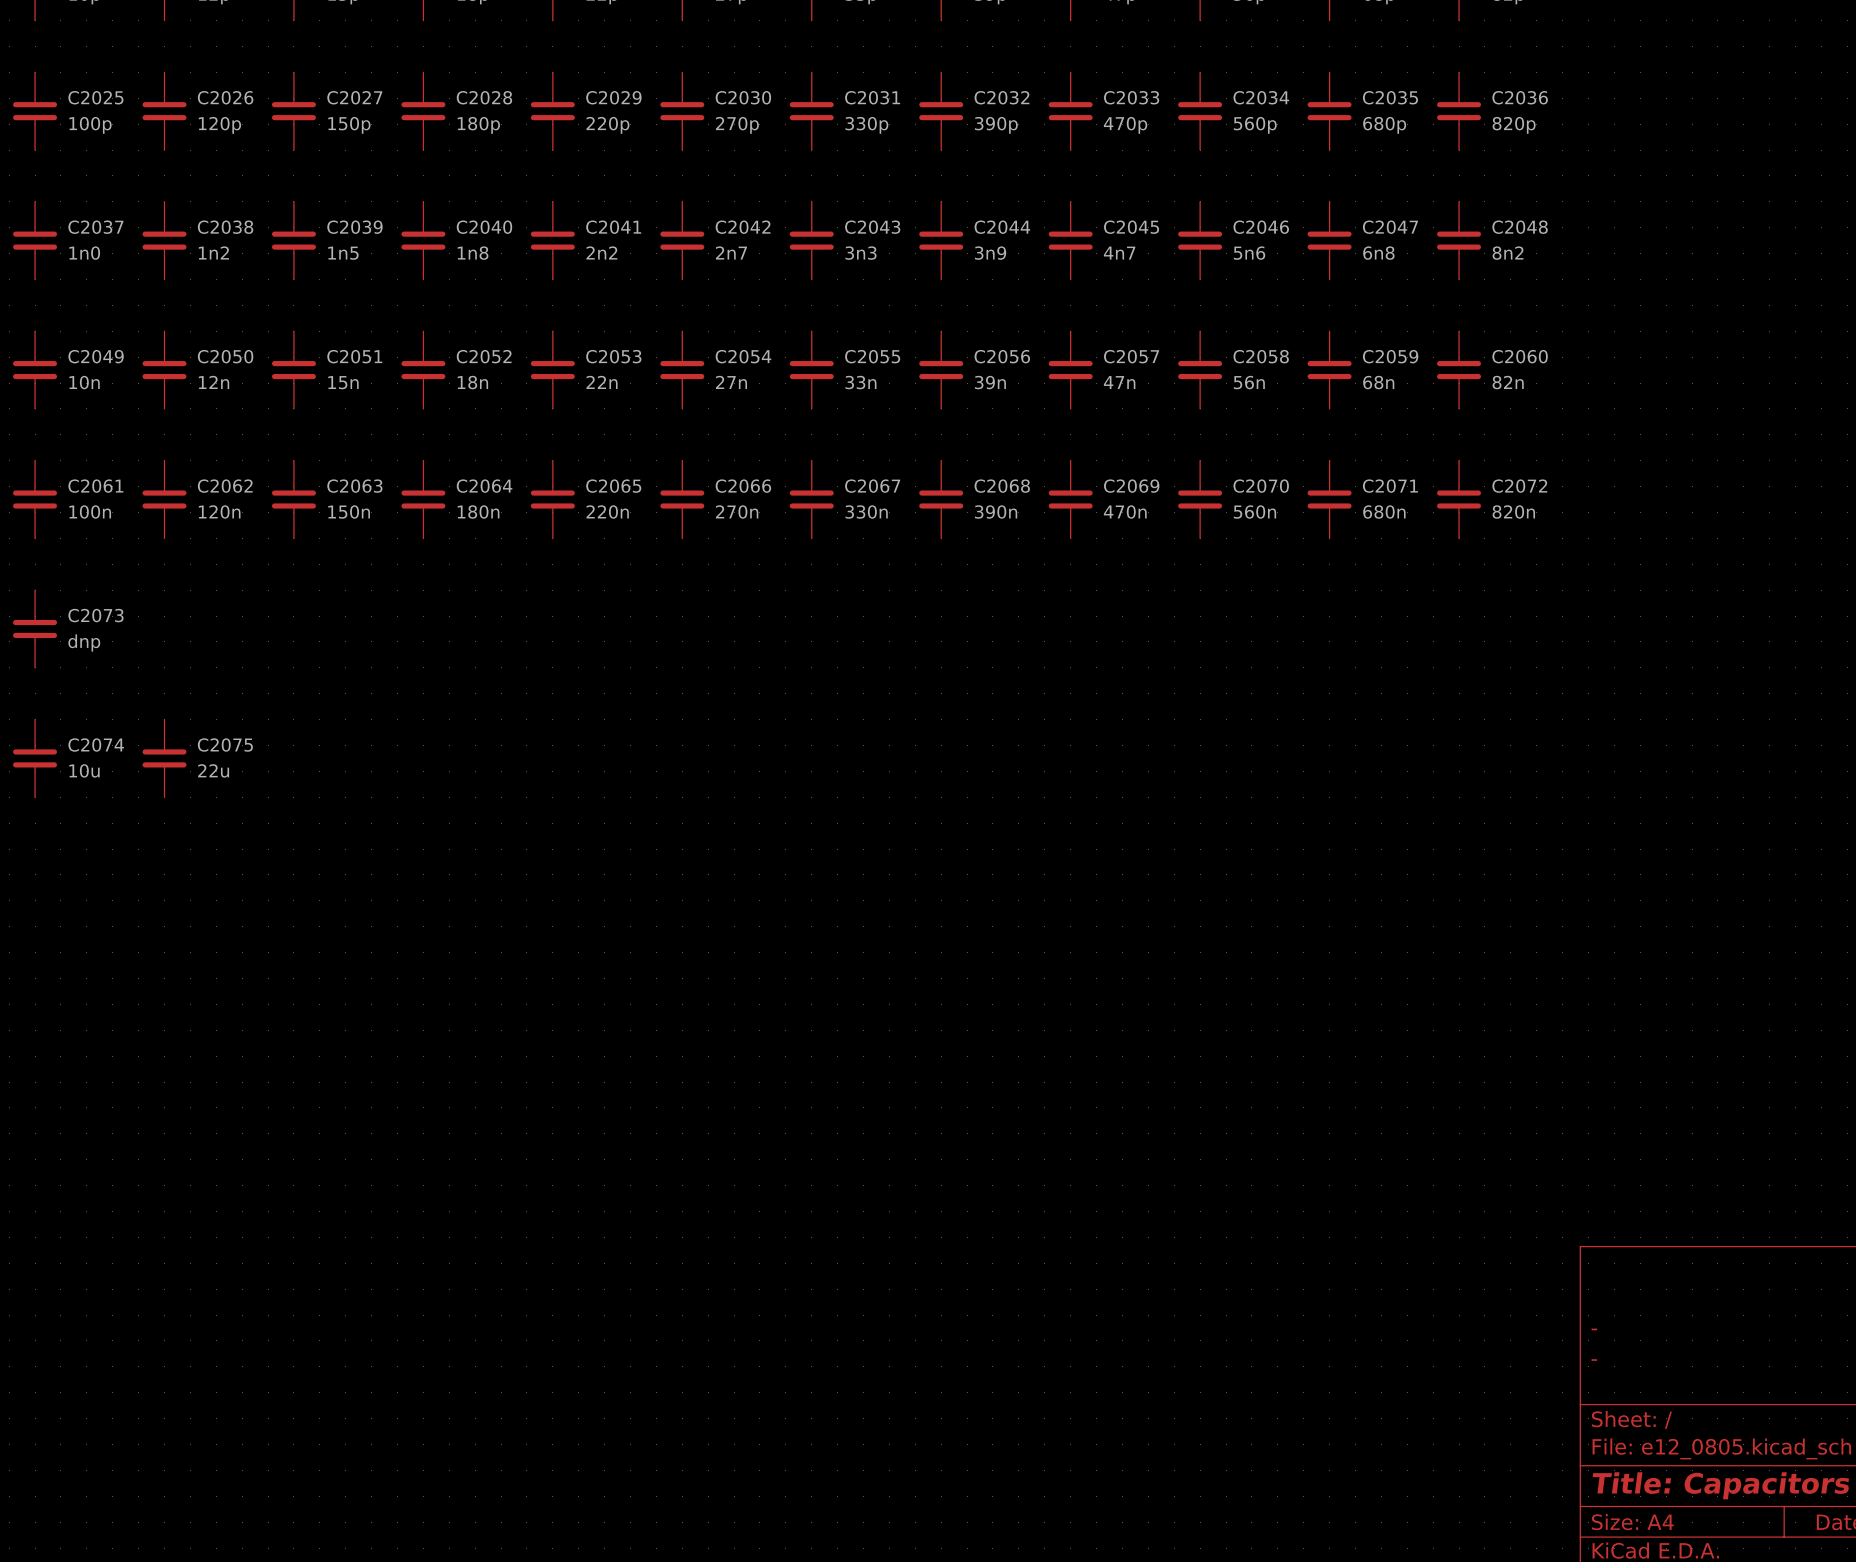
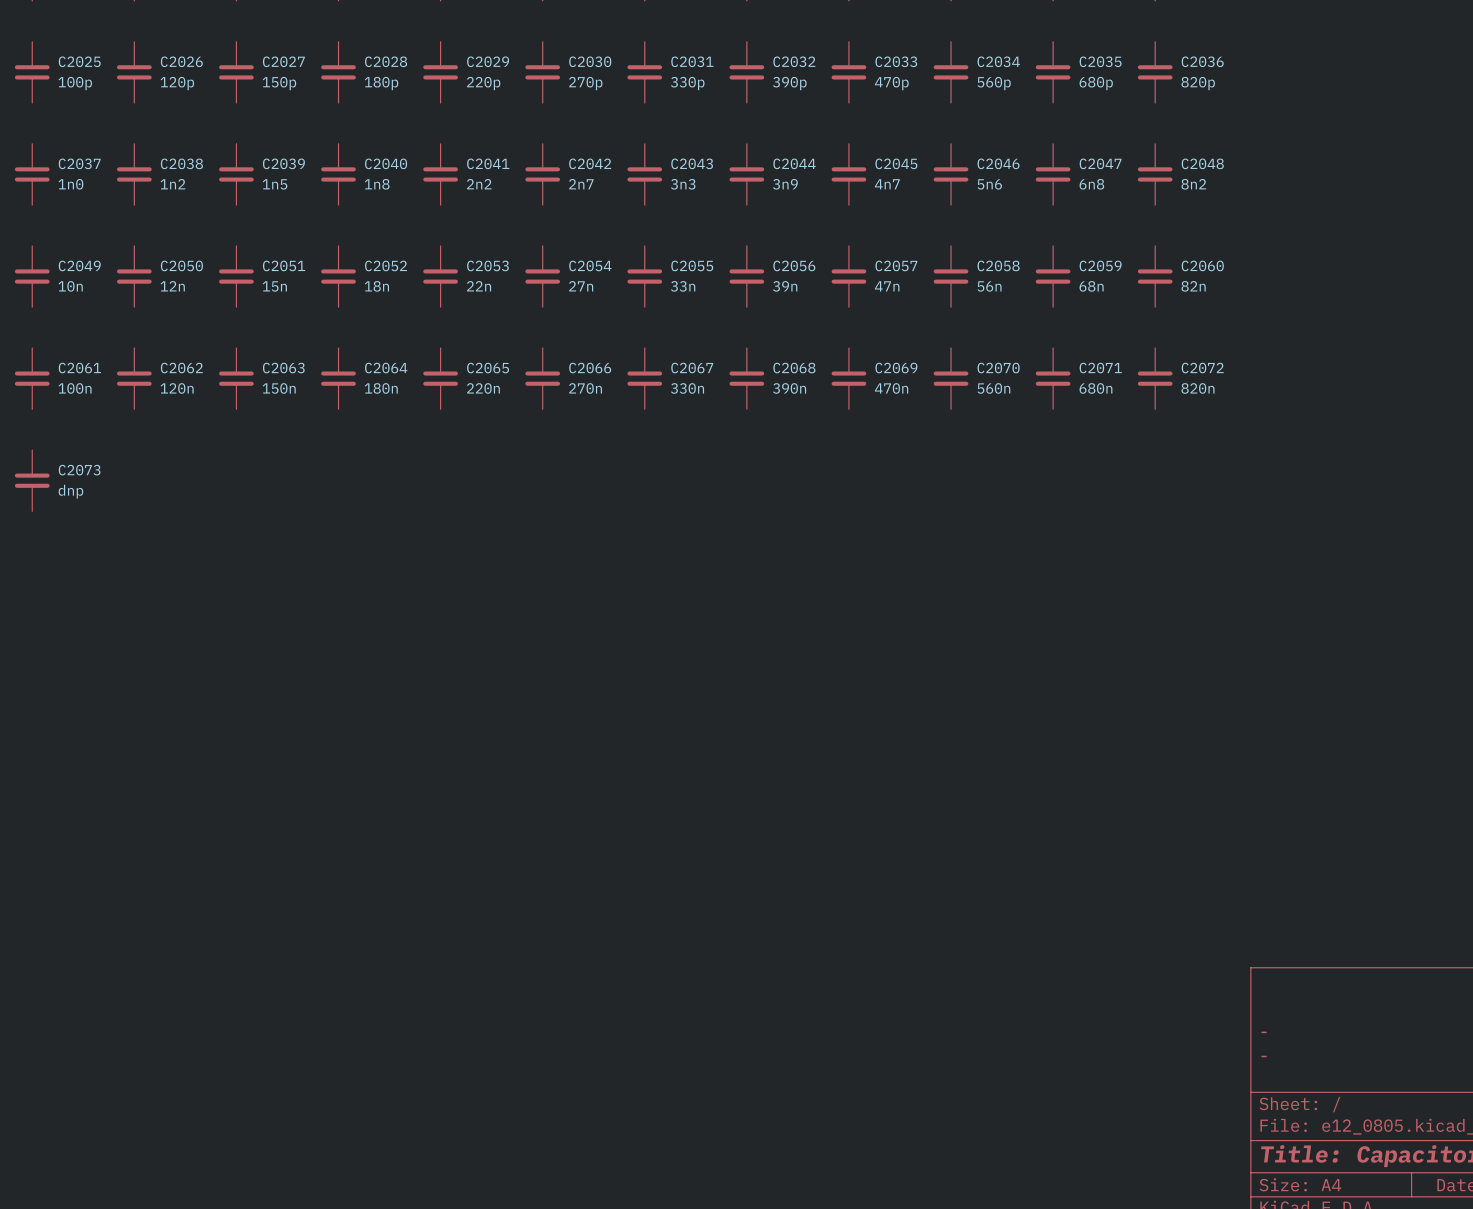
C2074: 10u (35, 758) -> none
C2075: 22u (164, 758) -> none

